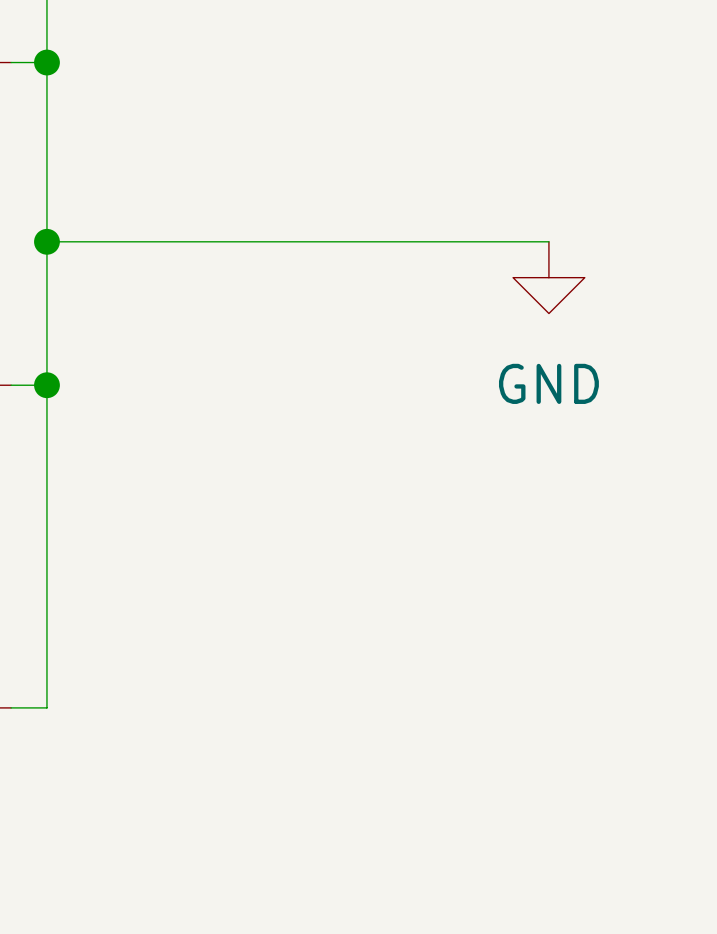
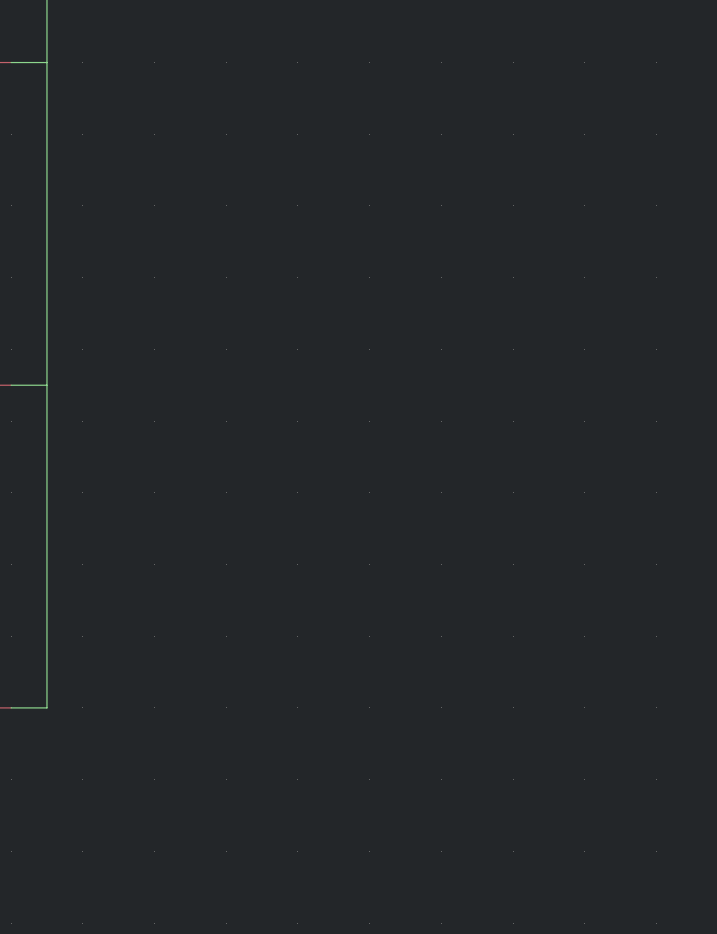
junction: (46, 62) -> none
wire: (46, 241) (548, 241) -> none
junction: (46, 241) -> none
power symbol: GND (548, 277) -> none
junction: (46, 385) -> none

